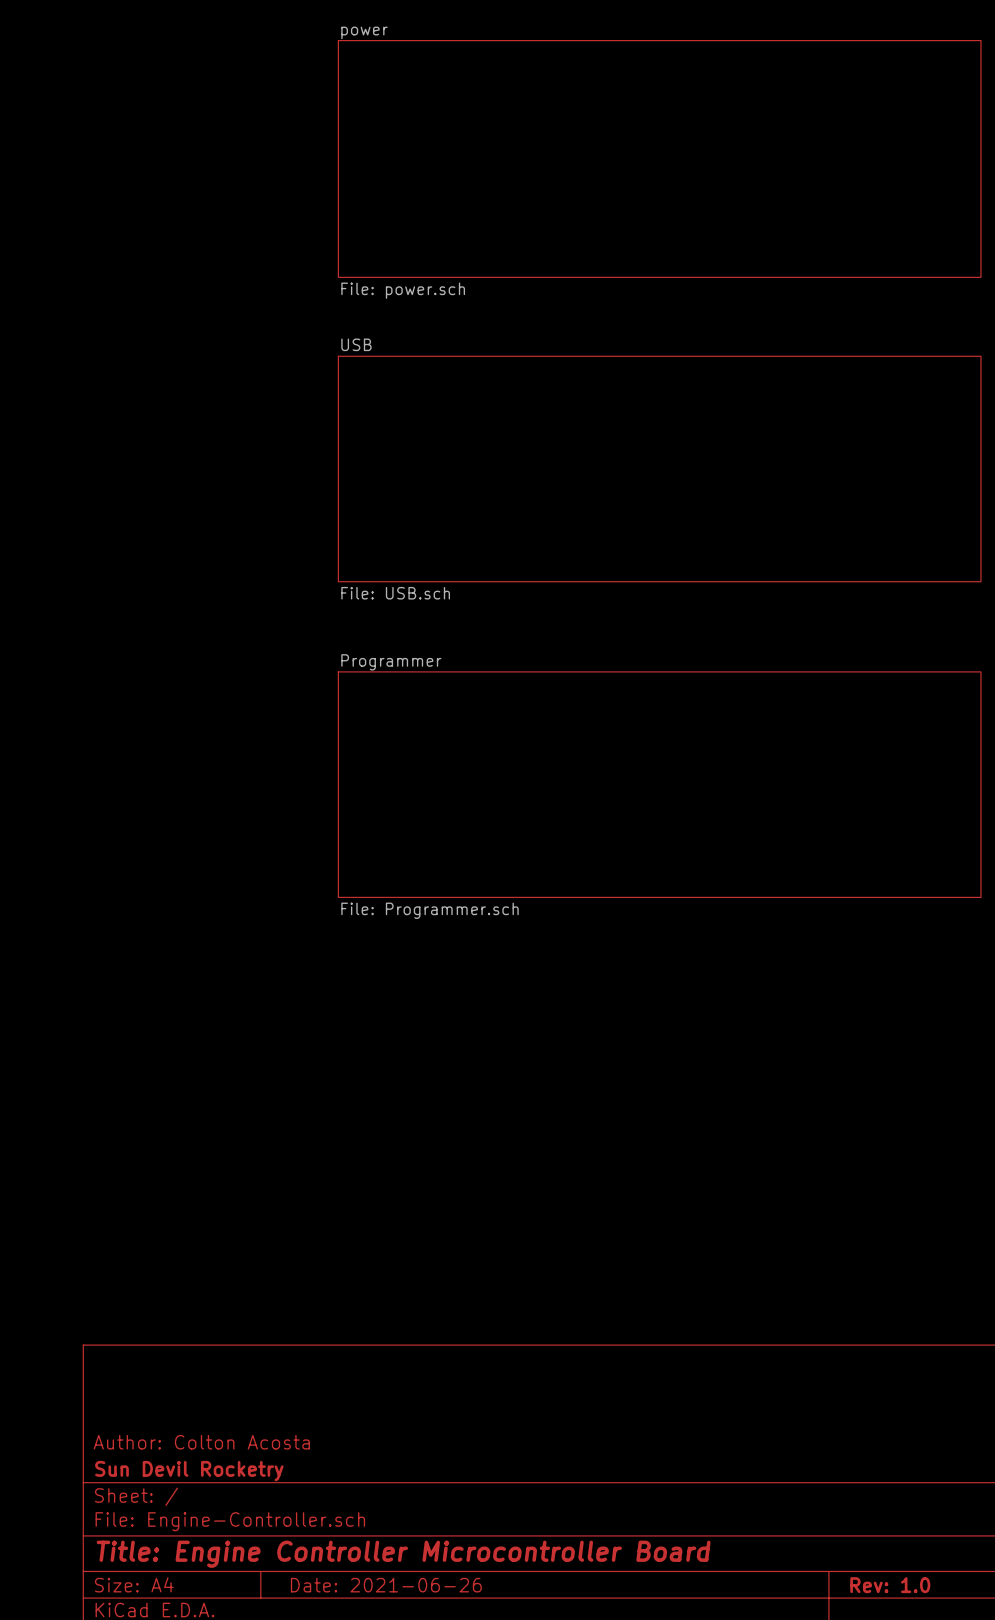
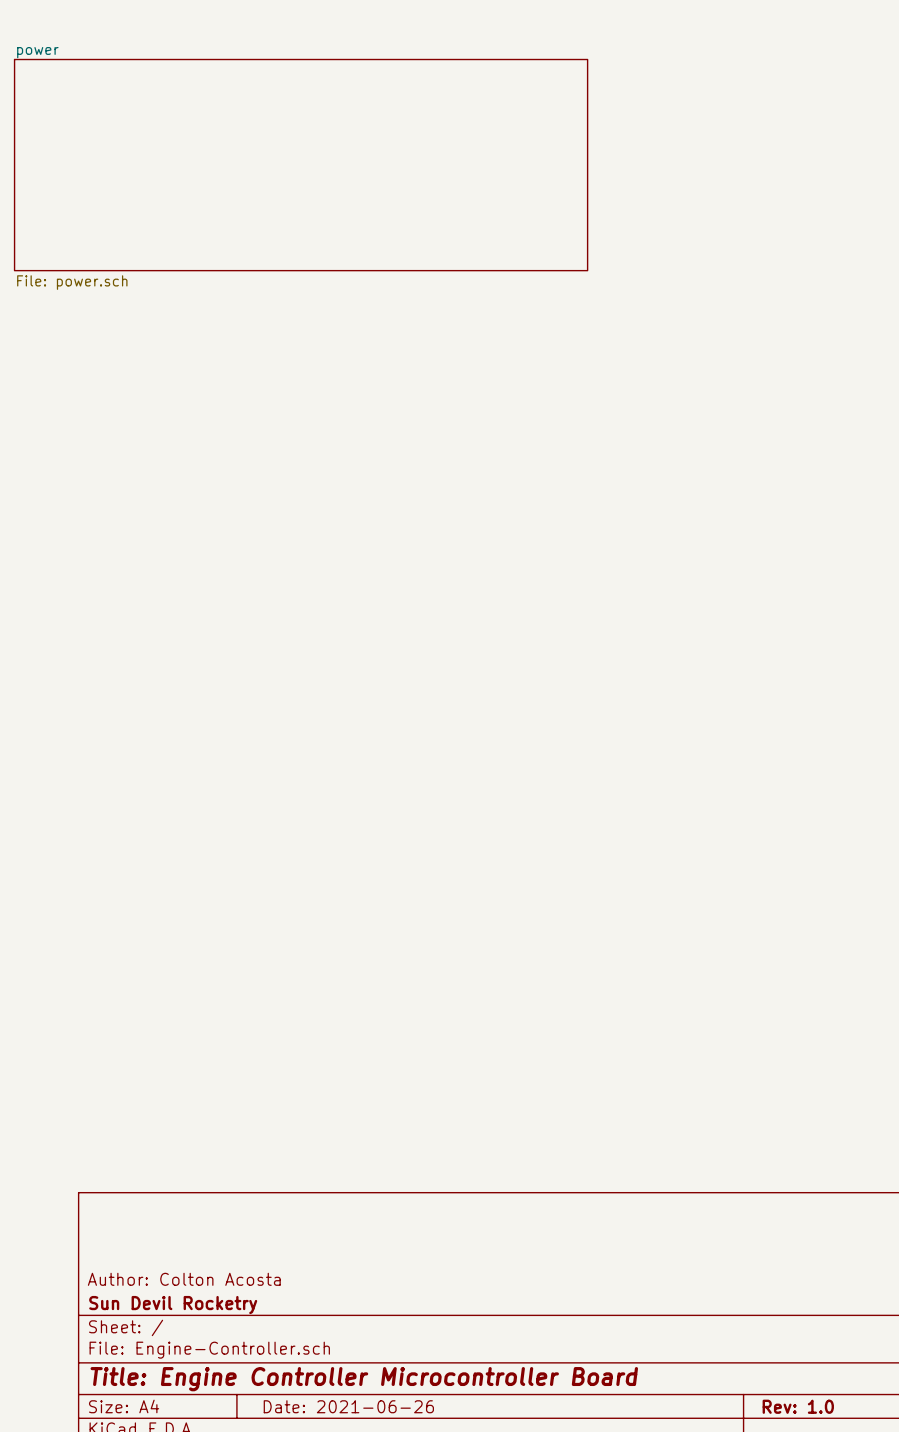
sheet power: File: power.sch (659, 158) -> none
sheet power: none -> File: power.sch (301, 165)
sheet USB: File: USB.sch (659, 468) -> none
sheet Programmer: File: Programmer.sch (659, 784) -> none

